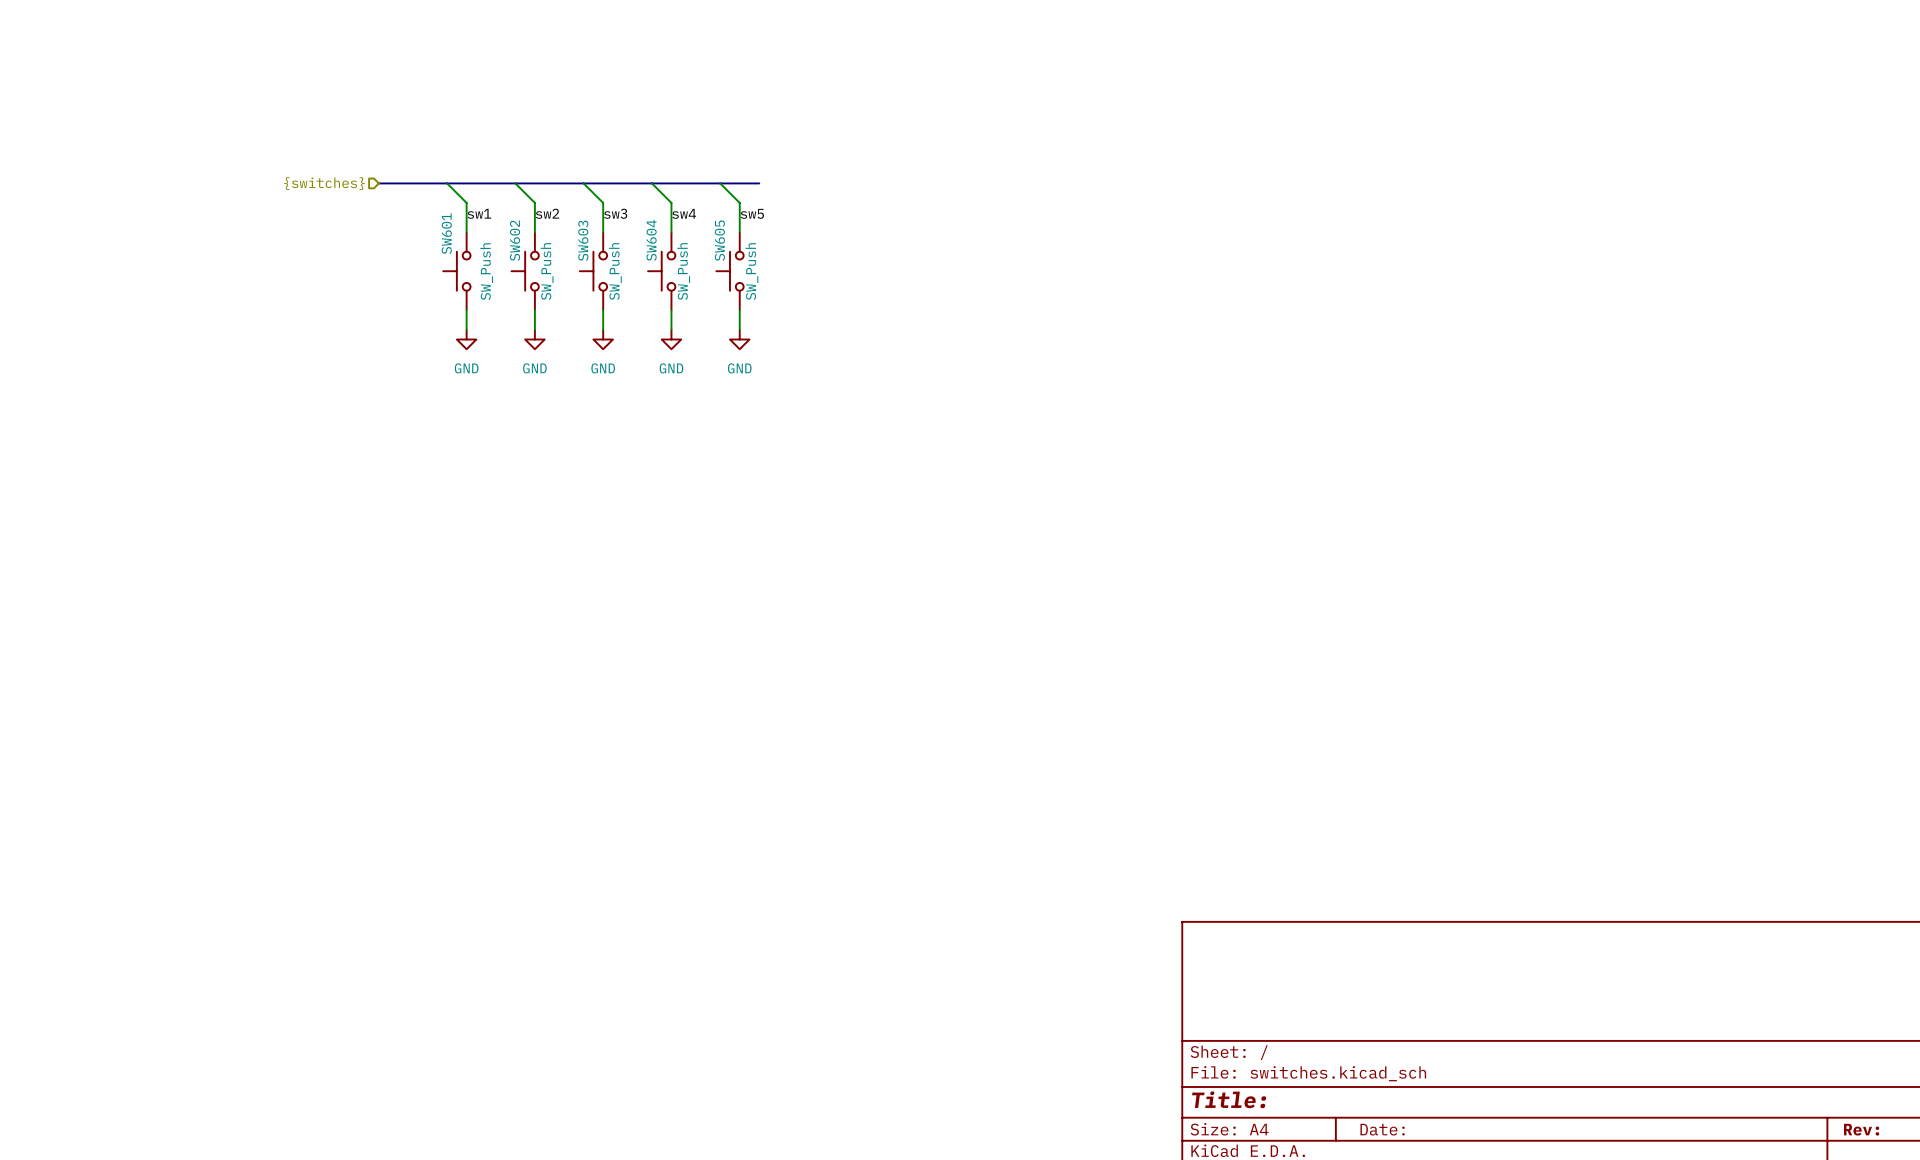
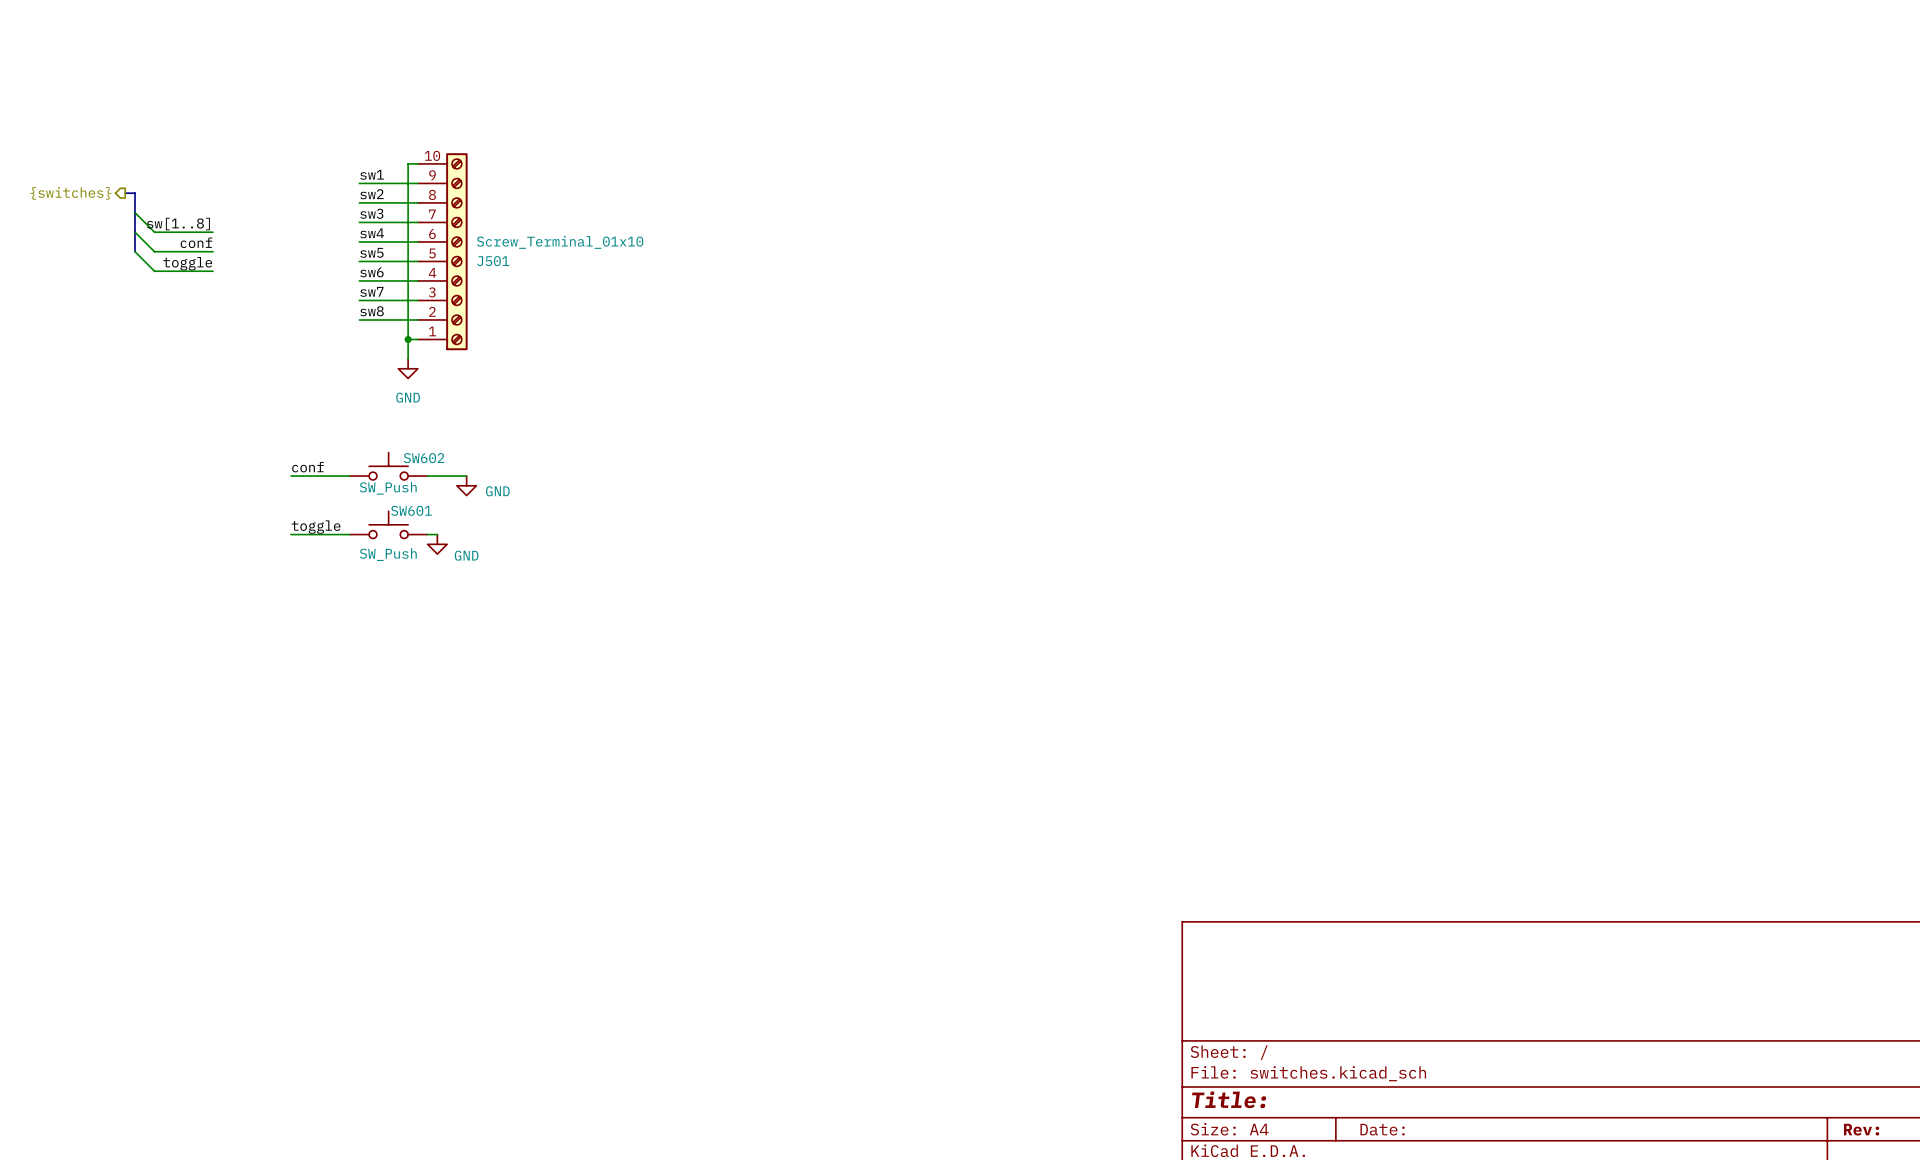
wire: none -> (417, 163) (408, 163) (408, 359)
hierarchical label: {switches} (324, 183) -> none
bus: (378, 183) (759, 183) -> none
wire: (515, 183) (534, 202) (534, 232) -> none
wire: (583, 183) (603, 202) (603, 232) -> none
wire: (651, 183) (671, 202) (671, 232) -> none
wire: (720, 183) (739, 202) (739, 232) -> none
hierarchical label: none -> {switches} (70, 193)
bus: none -> (125, 193) (135, 193) (135, 251)
wire: none -> (359, 202) (417, 202)
wire: none -> (135, 212) (154, 232) (213, 232)
label: none -> sw3 (371, 213)
label position: sw1 (479, 213) -> sw1 (372, 174)
label position: sw2 (547, 213) -> sw2 (371, 194)
label: sw3 (615, 213) -> none
label: sw4 (684, 213) -> none
label: sw5 (752, 213) -> none
wire: none -> (359, 222) (417, 222)
label: none -> sw[1..8] (178, 224)
wire: none -> (135, 232) (154, 251) (213, 251)
label: none -> sw4 (372, 233)
wire: none -> (359, 241) (417, 241)
label: none -> conf (196, 242)
wire: none -> (135, 251) (154, 271) (213, 271)
J501: none -> Screw_Terminal_01x10 (442, 251)
label: none -> sw5 (371, 252)
wire: none -> (359, 261) (417, 261)
label: none -> toggle (187, 263)
SW601 rotation: 0° (456, 271) -> 90° clockwise (388, 524)
SW601 position: (456, 271) -> (388, 524)
SW601 value position: SW_Push (486, 271) -> SW_Push (388, 554)
SW602 rotation: 0° (525, 271) -> 90° clockwise (388, 466)
SW602 position: (525, 271) -> (388, 466)
SW603: SW_Push (593, 271) -> none
SW604: SW_Push (661, 271) -> none
SW605: SW_Push (729, 271) -> none
label: none -> sw6 (371, 272)
wire: none -> (359, 280) (417, 280)
label: none -> sw7 (371, 291)
wire: none -> (359, 300) (417, 300)
wire: (534, 310) (534, 329) -> none
wire: (603, 310) (603, 329) -> none
wire: (671, 310) (671, 329) -> none
wire: (739, 310) (739, 329) -> none
label: none -> sw8 (372, 311)
wire: none -> (359, 319) (417, 319)
wire: none -> (408, 339) (417, 339)
junction: none -> (408, 339)
power symbol: GND (466, 339) -> none
power symbol: GND (534, 339) -> none
power symbol: GND (603, 339) -> none
power symbol: GND (671, 339) -> none
power symbol: GND (739, 339) -> none
power symbol: none -> GND (408, 368)
label: none -> conf (308, 467)
wire: none -> (291, 476) (349, 476)
wire: none -> (427, 476) (466, 476)
power symbol: none -> GND (466, 485)
label: none -> toggle (316, 527)
wire: none -> (291, 534) (349, 534)
wire: none -> (427, 534) (437, 534)
power symbol: none -> GND (437, 544)

